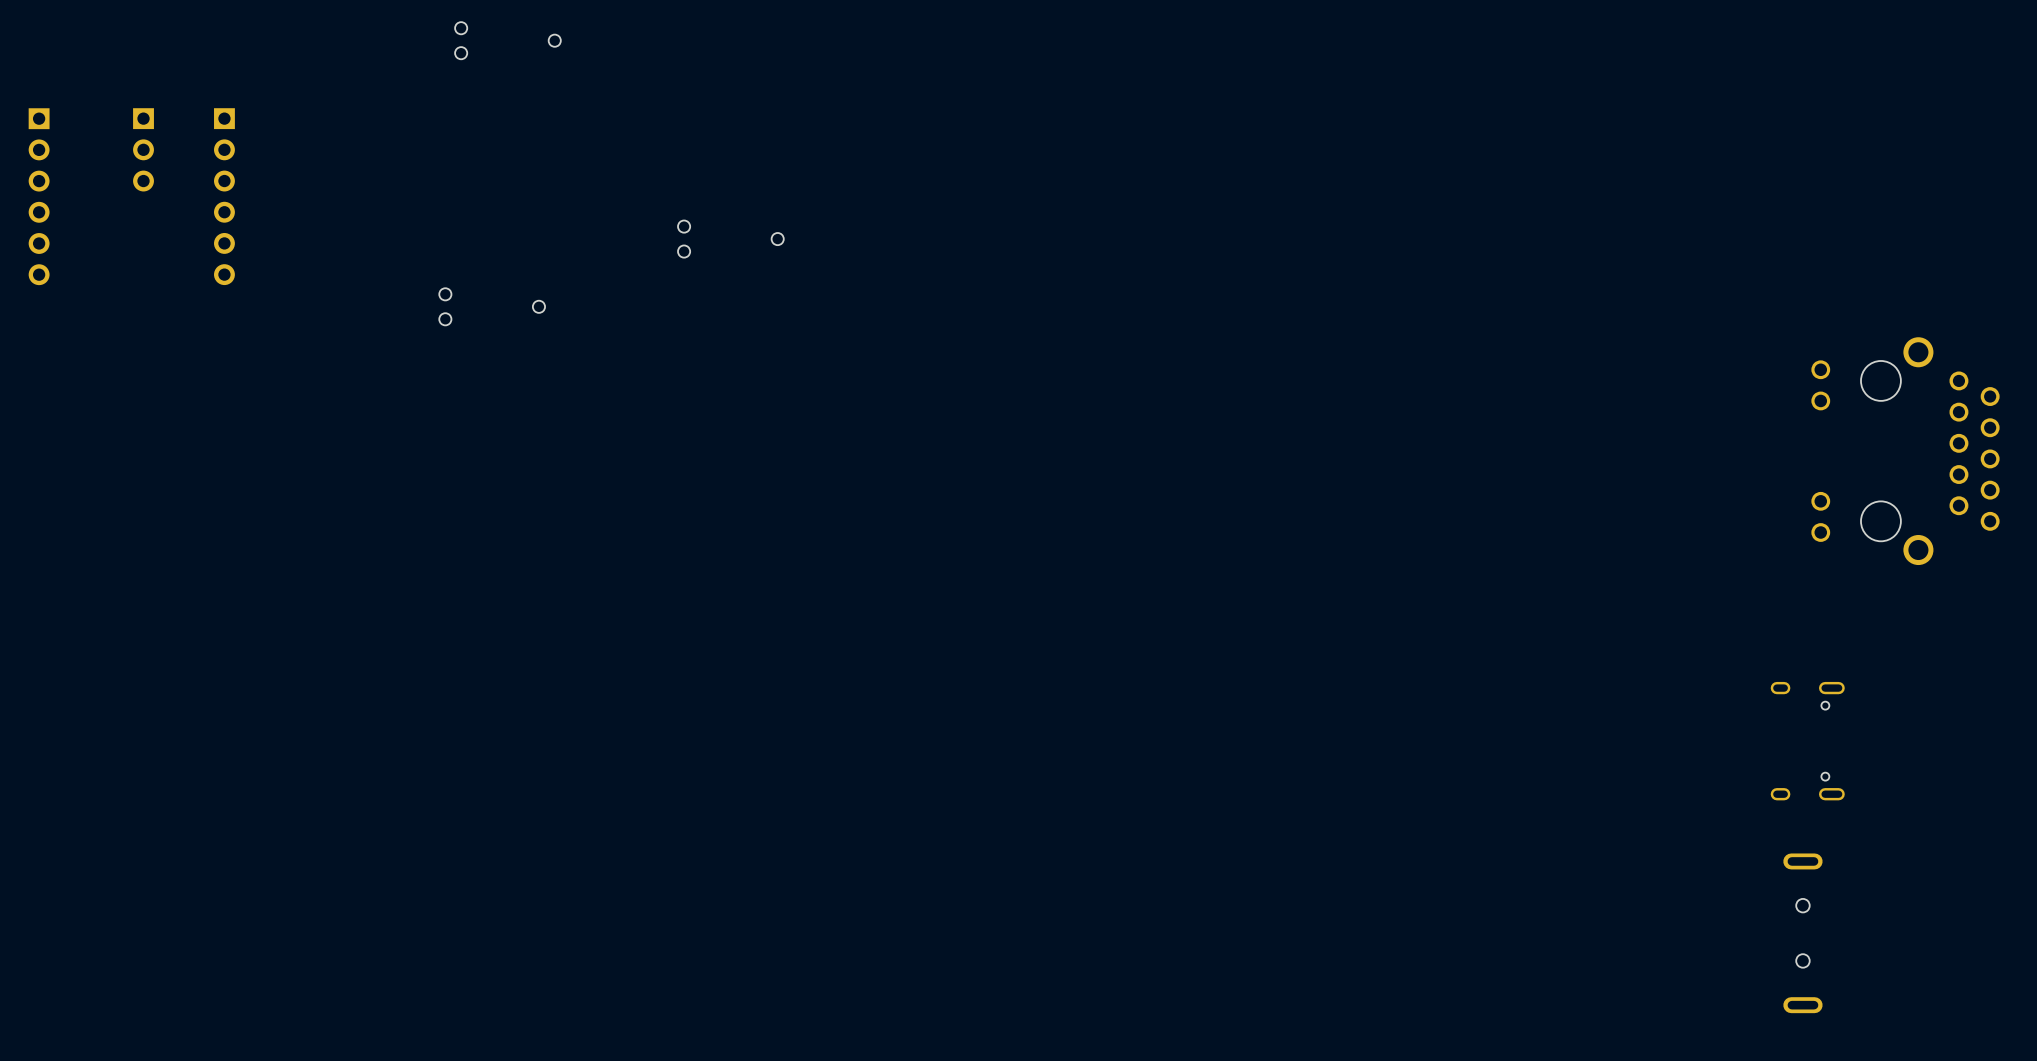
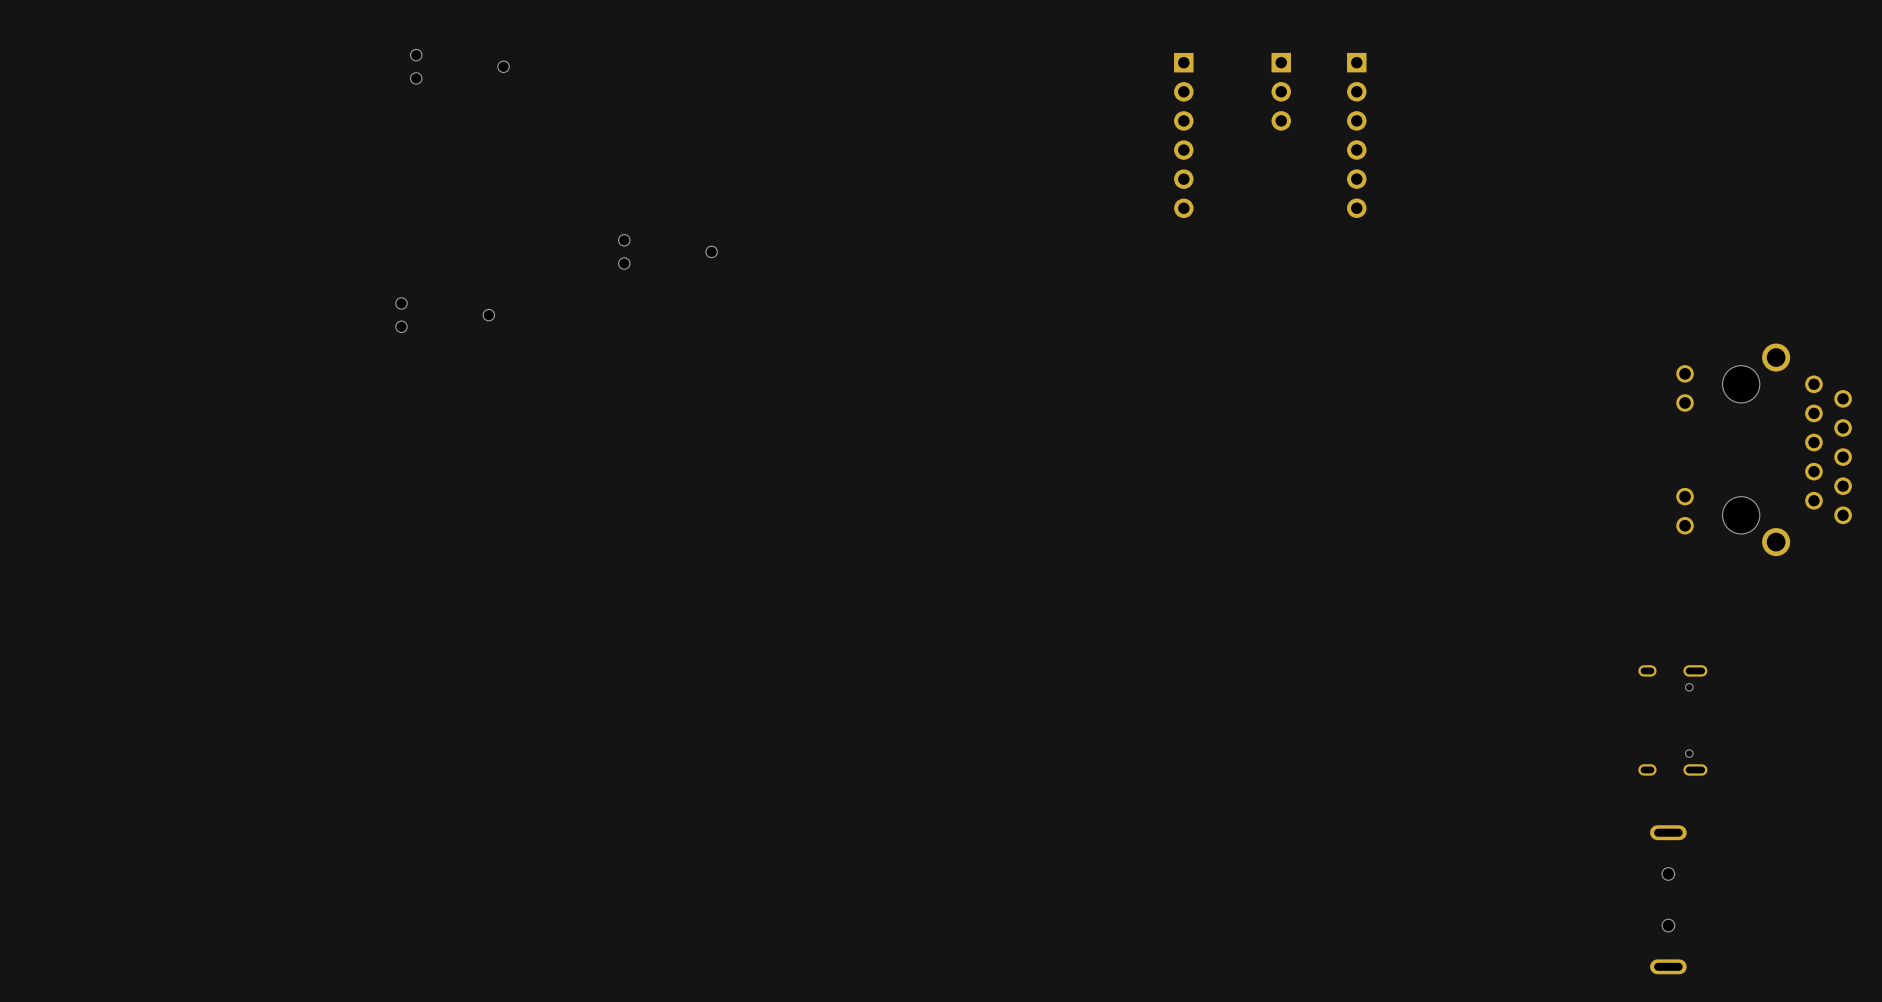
part: none -> (1281, 91)
part: none -> (1183, 135)
part: none -> (1356, 135)
part: (143, 149) -> none
part: (39, 196) -> none
part: (224, 196) -> none

